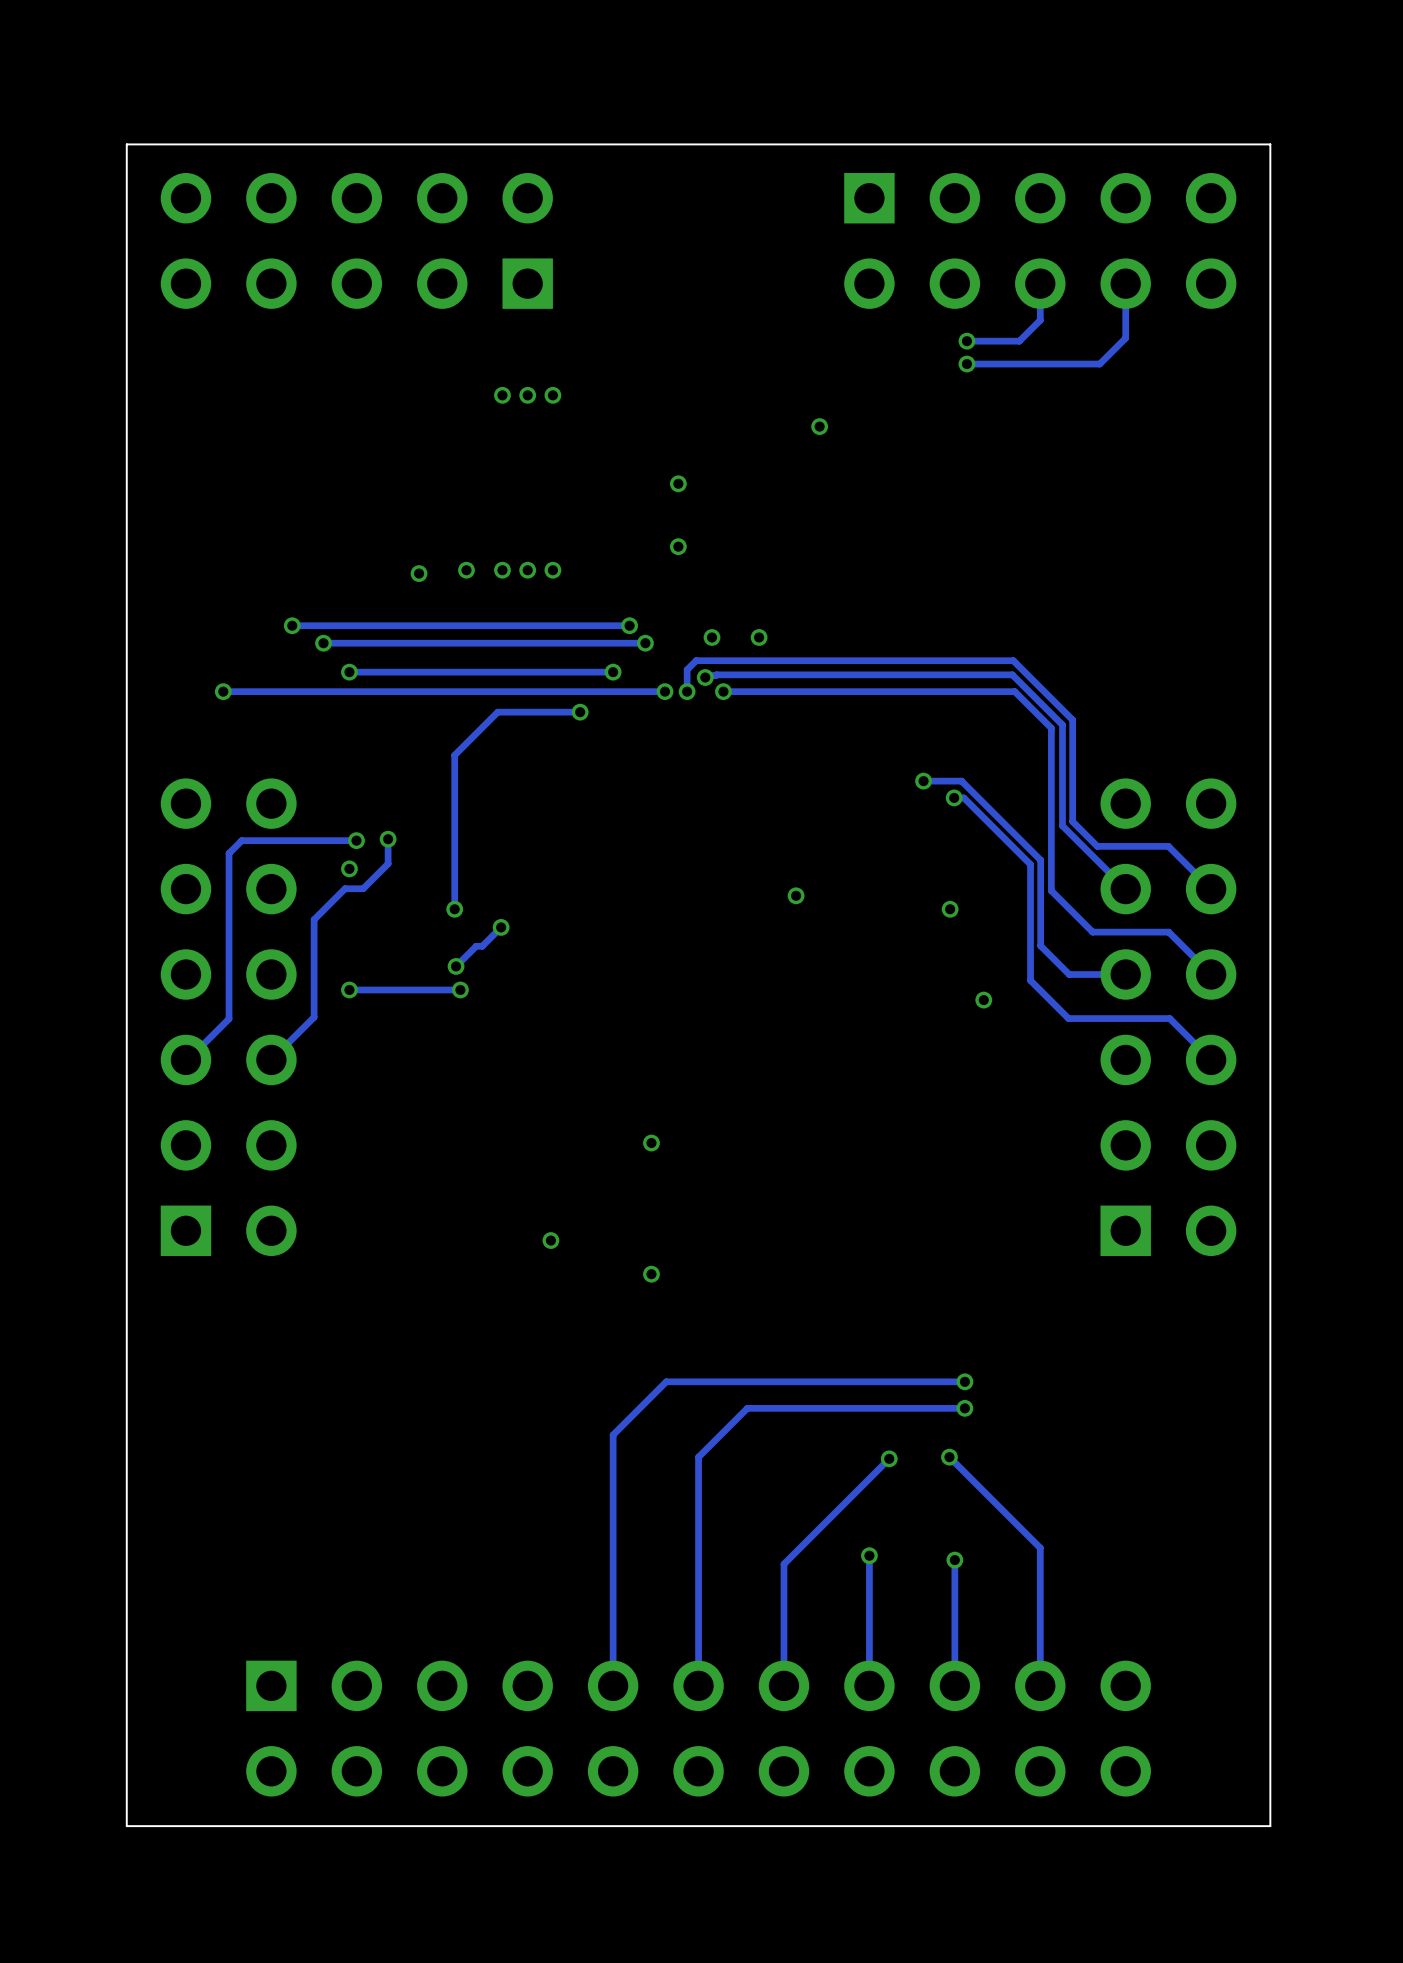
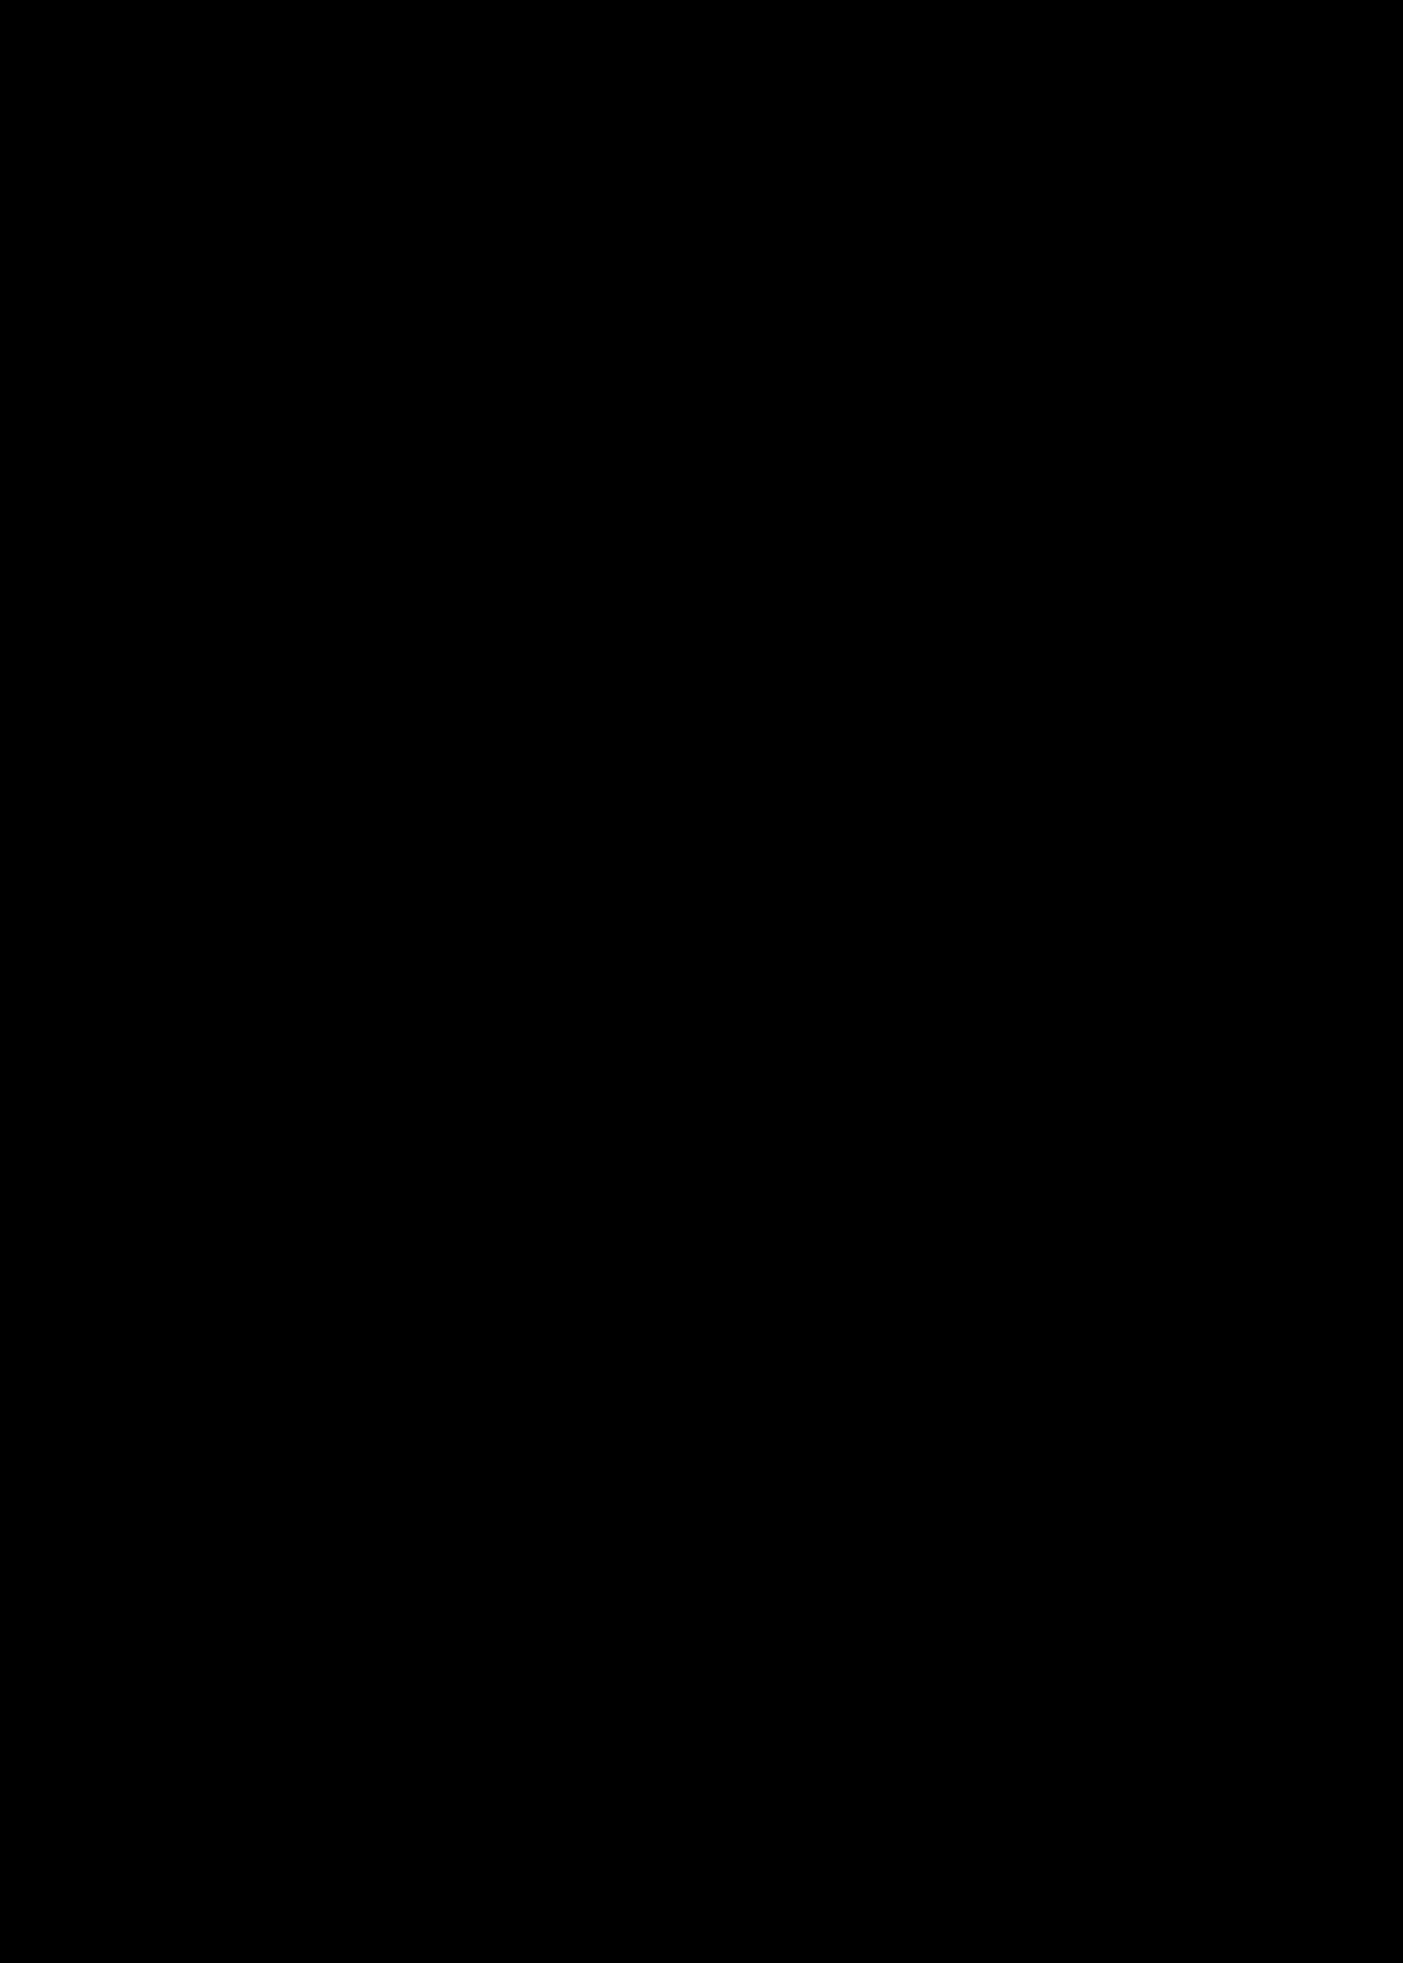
board edge: (1270, 144) (126, 144) (126, 1826) (1270, 1826) (1270, 144) -> none
part: (356, 240) -> none
part: (1040, 240) -> none
track: (1040, 283) (1040, 320) (1019, 341) (966, 341) -> none
track: (1125, 283) (1125, 338) (1099, 364) (966, 364) -> none
via: (966, 341) -> none
via: (966, 364) -> none
via: (502, 395) -> none
via: (527, 395) -> none
via: (552, 395) -> none
via: (819, 426) -> none
via: (678, 483) -> none
via: (678, 546) -> none
via: (466, 570) -> none
via: (502, 570) -> none
via: (527, 570) -> none
via: (552, 570) -> none
via: (419, 573) -> none
via: (292, 625) -> none
track: (629, 625) (292, 625) -> none
via: (629, 625) -> none
via: (712, 637) -> none
via: (759, 637) -> none
via: (323, 643) -> none
track: (645, 643) (323, 643) -> none
via: (645, 643) -> none
via: (349, 672) -> none
track: (613, 672) (349, 672) -> none
via: (613, 672) -> none
track: (705, 677) (716, 674) (1012, 674) (1062, 724) (1062, 825) (1125, 889) -> none
via: (705, 677) -> none
via: (223, 691) -> none
track: (664, 691) (223, 691) -> none
via: (664, 691) -> none
track: (687, 691) (687, 669) (696, 660) (1013, 660) (1072, 719) (1072, 821) (1097, 846) (1168, 846) (1211, 889) -> none
via: (687, 691) -> none
track: (723, 691) (1014, 691) (1051, 728) (1051, 890) (1092, 932) (1168, 932) (1211, 974) -> none
via: (723, 691) -> none
track: (580, 712) (497, 712) (454, 755) (454, 909) -> none
via: (580, 712) -> none
track: (923, 781) (961, 781) (1040, 860) (1040, 945) (1069, 974) (1125, 974) -> none
via: (923, 781) -> none
track: (954, 797) (963, 797) (1030, 864) (1030, 980) (1068, 1018) (1169, 1018) (1211, 1059) -> none
via: (954, 797) -> none
track: (388, 839) (388, 863) (363, 888) (345, 888) (314, 919) (314, 1017) (271, 1059) -> none
via: (388, 839) -> none
track: (356, 840) (241, 840) (229, 853) (229, 1018) (185, 1059) -> none
via: (356, 840) -> none
via: (349, 868) -> none
via: (796, 895) -> none
via: (454, 909) -> none
via: (950, 909) -> none
track: (501, 927) (482, 946) (476, 946) (456, 966) -> none
via: (501, 927) -> none
via: (456, 966) -> none
via: (349, 989) -> none
track: (460, 989) (349, 989) -> none
via: (460, 989) -> none
via: (983, 1000) -> none
part: (228, 1017) -> none
part: (1168, 1017) -> none
via: (651, 1143) -> none
via: (550, 1240) -> none
via: (651, 1274) -> none
track: (964, 1381) (666, 1381) (613, 1434) (613, 1685) -> none
via: (964, 1381) -> none
track: (964, 1408) (747, 1408) (698, 1457) (698, 1685) -> none
via: (964, 1408) -> none
track: (949, 1457) (1040, 1547) (1040, 1685) -> none
via: (949, 1457) -> none
track: (889, 1458) (783, 1564) (783, 1685) -> none
via: (889, 1458) -> none
track: (869, 1555) (869, 1685) -> none
via: (869, 1555) -> none
track: (954, 1560) (954, 1685) -> none
via: (954, 1560) -> none
part: (698, 1728) -> none

